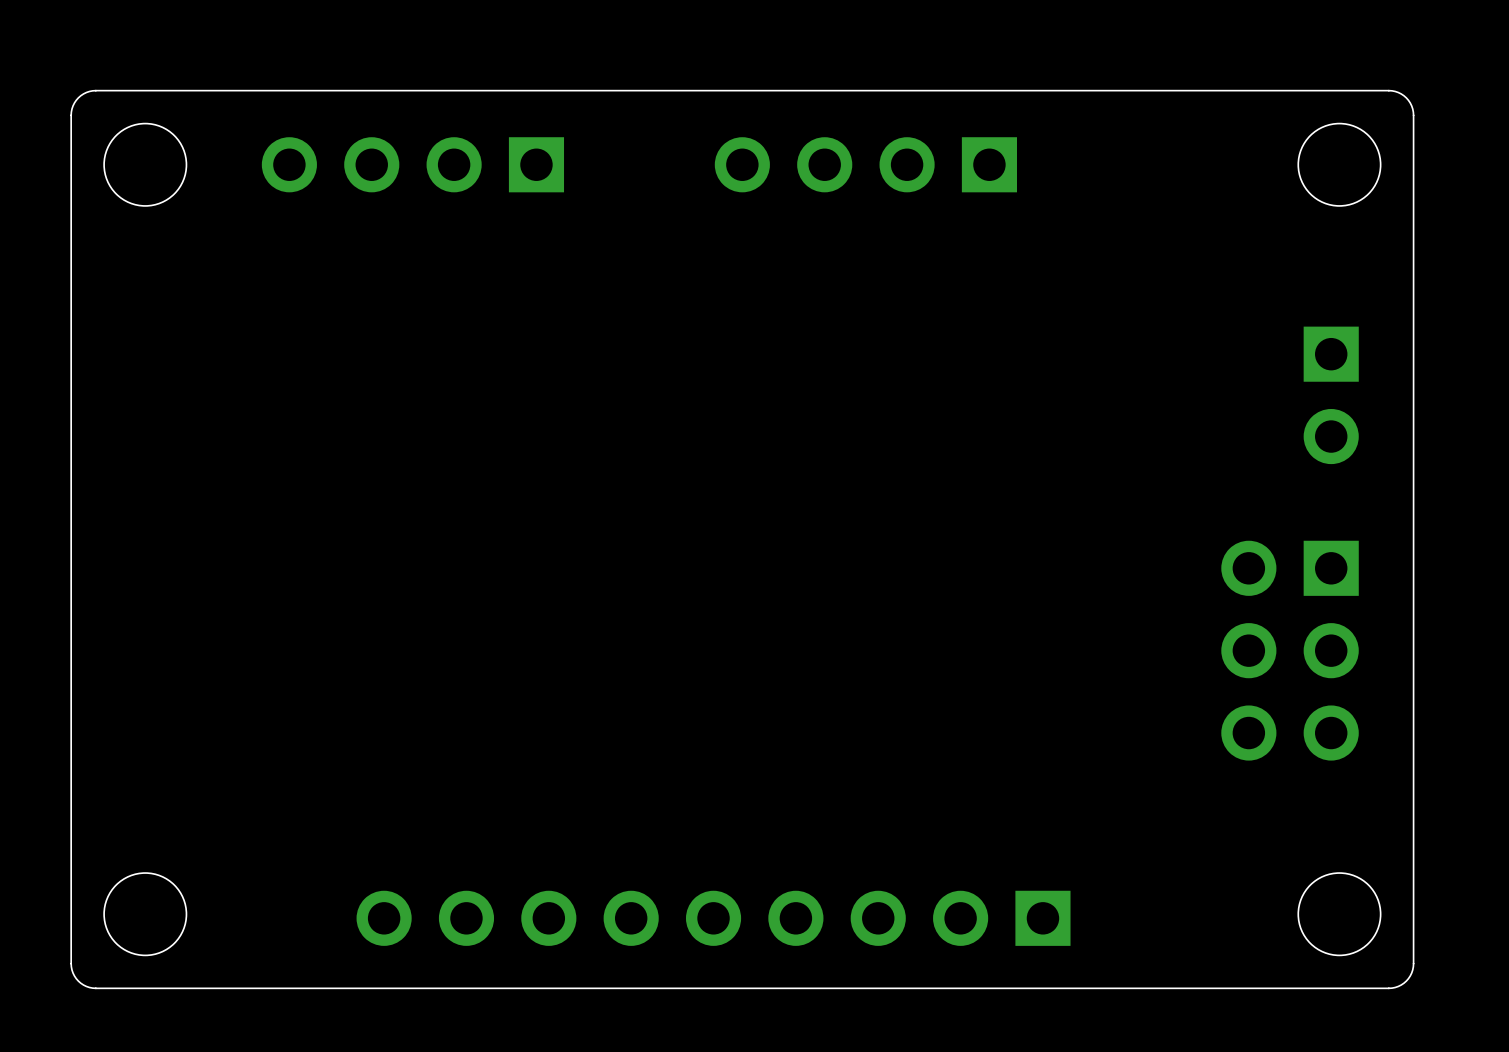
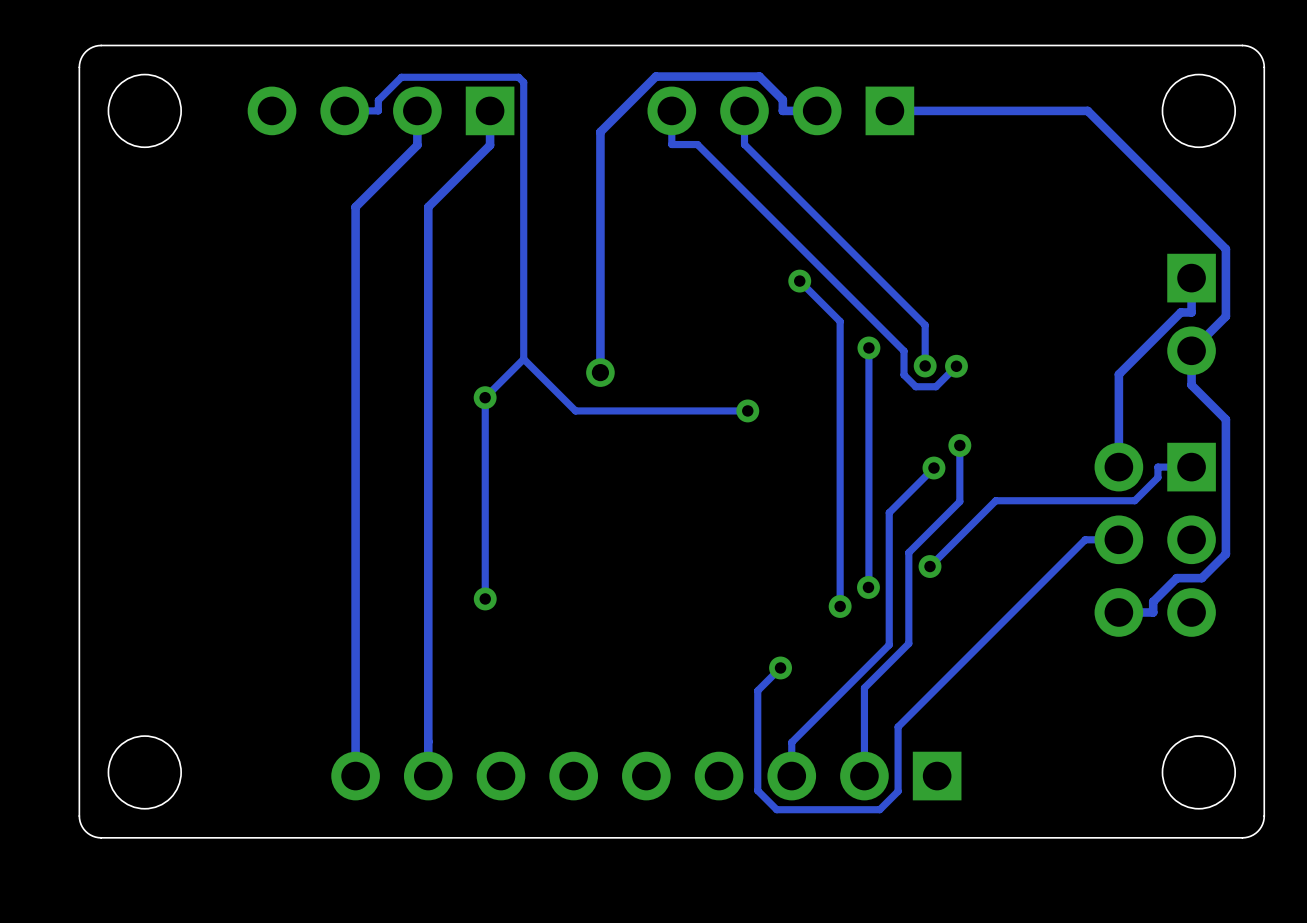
track: none -> (344, 110) (378, 110) (378, 100) (401, 77) (518, 77) (523, 82) (523, 359)
track: none -> (417, 110) (417, 145) (355, 207) (355, 776)
track: none -> (490, 110) (490, 145) (428, 207) (428, 776)
track: none -> (671, 110) (671, 144) (697, 144) (904, 351) (904, 374) (915, 386) (936, 386) (956, 366)
track: none -> (744, 110) (744, 144) (925, 325) (925, 365)
track: none -> (817, 110) (782, 110) (782, 99) (759, 76) (655, 76) (600, 132) (600, 372)
track: none -> (889, 110) (1087, 110) (1225, 249) (1225, 316) (1191, 350) (1191, 385) (1225, 419) (1225, 554) (1201, 578) (1176, 578) (1153, 601) (1153, 612) (1118, 612)
track: none -> (1191, 278) (1191, 312) (1180, 312) (1118, 374) (1118, 467)
track: none -> (799, 281) (840, 321) (840, 606)
via: none -> (799, 281)
track: none -> (868, 347) (868, 587)
via: none -> (868, 347)
track: none -> (523, 359) (485, 397)
track: none -> (523, 359) (575, 410) (747, 410)
via: none -> (925, 365)
via: none -> (956, 366)
via: none -> (600, 372)
via: none -> (485, 397)
track: none -> (485, 397) (485, 598)
via: none -> (747, 410)
track: none -> (959, 445) (959, 501) (908, 552) (908, 643) (864, 687) (864, 776)
via: none -> (959, 445)
track: none -> (1191, 467) (1157, 467) (1157, 477) (1134, 500) (995, 500) (930, 566)
track: none -> (933, 468) (889, 512) (889, 644) (791, 742) (791, 776)
via: none -> (933, 468)
track: none -> (1118, 539) (1085, 539) (898, 726) (898, 791) (879, 809) (776, 809) (757, 790) (757, 690) (780, 667)
via: none -> (930, 566)
via: none -> (868, 587)
via: none -> (485, 598)
via: none -> (840, 606)
via: none -> (780, 667)

